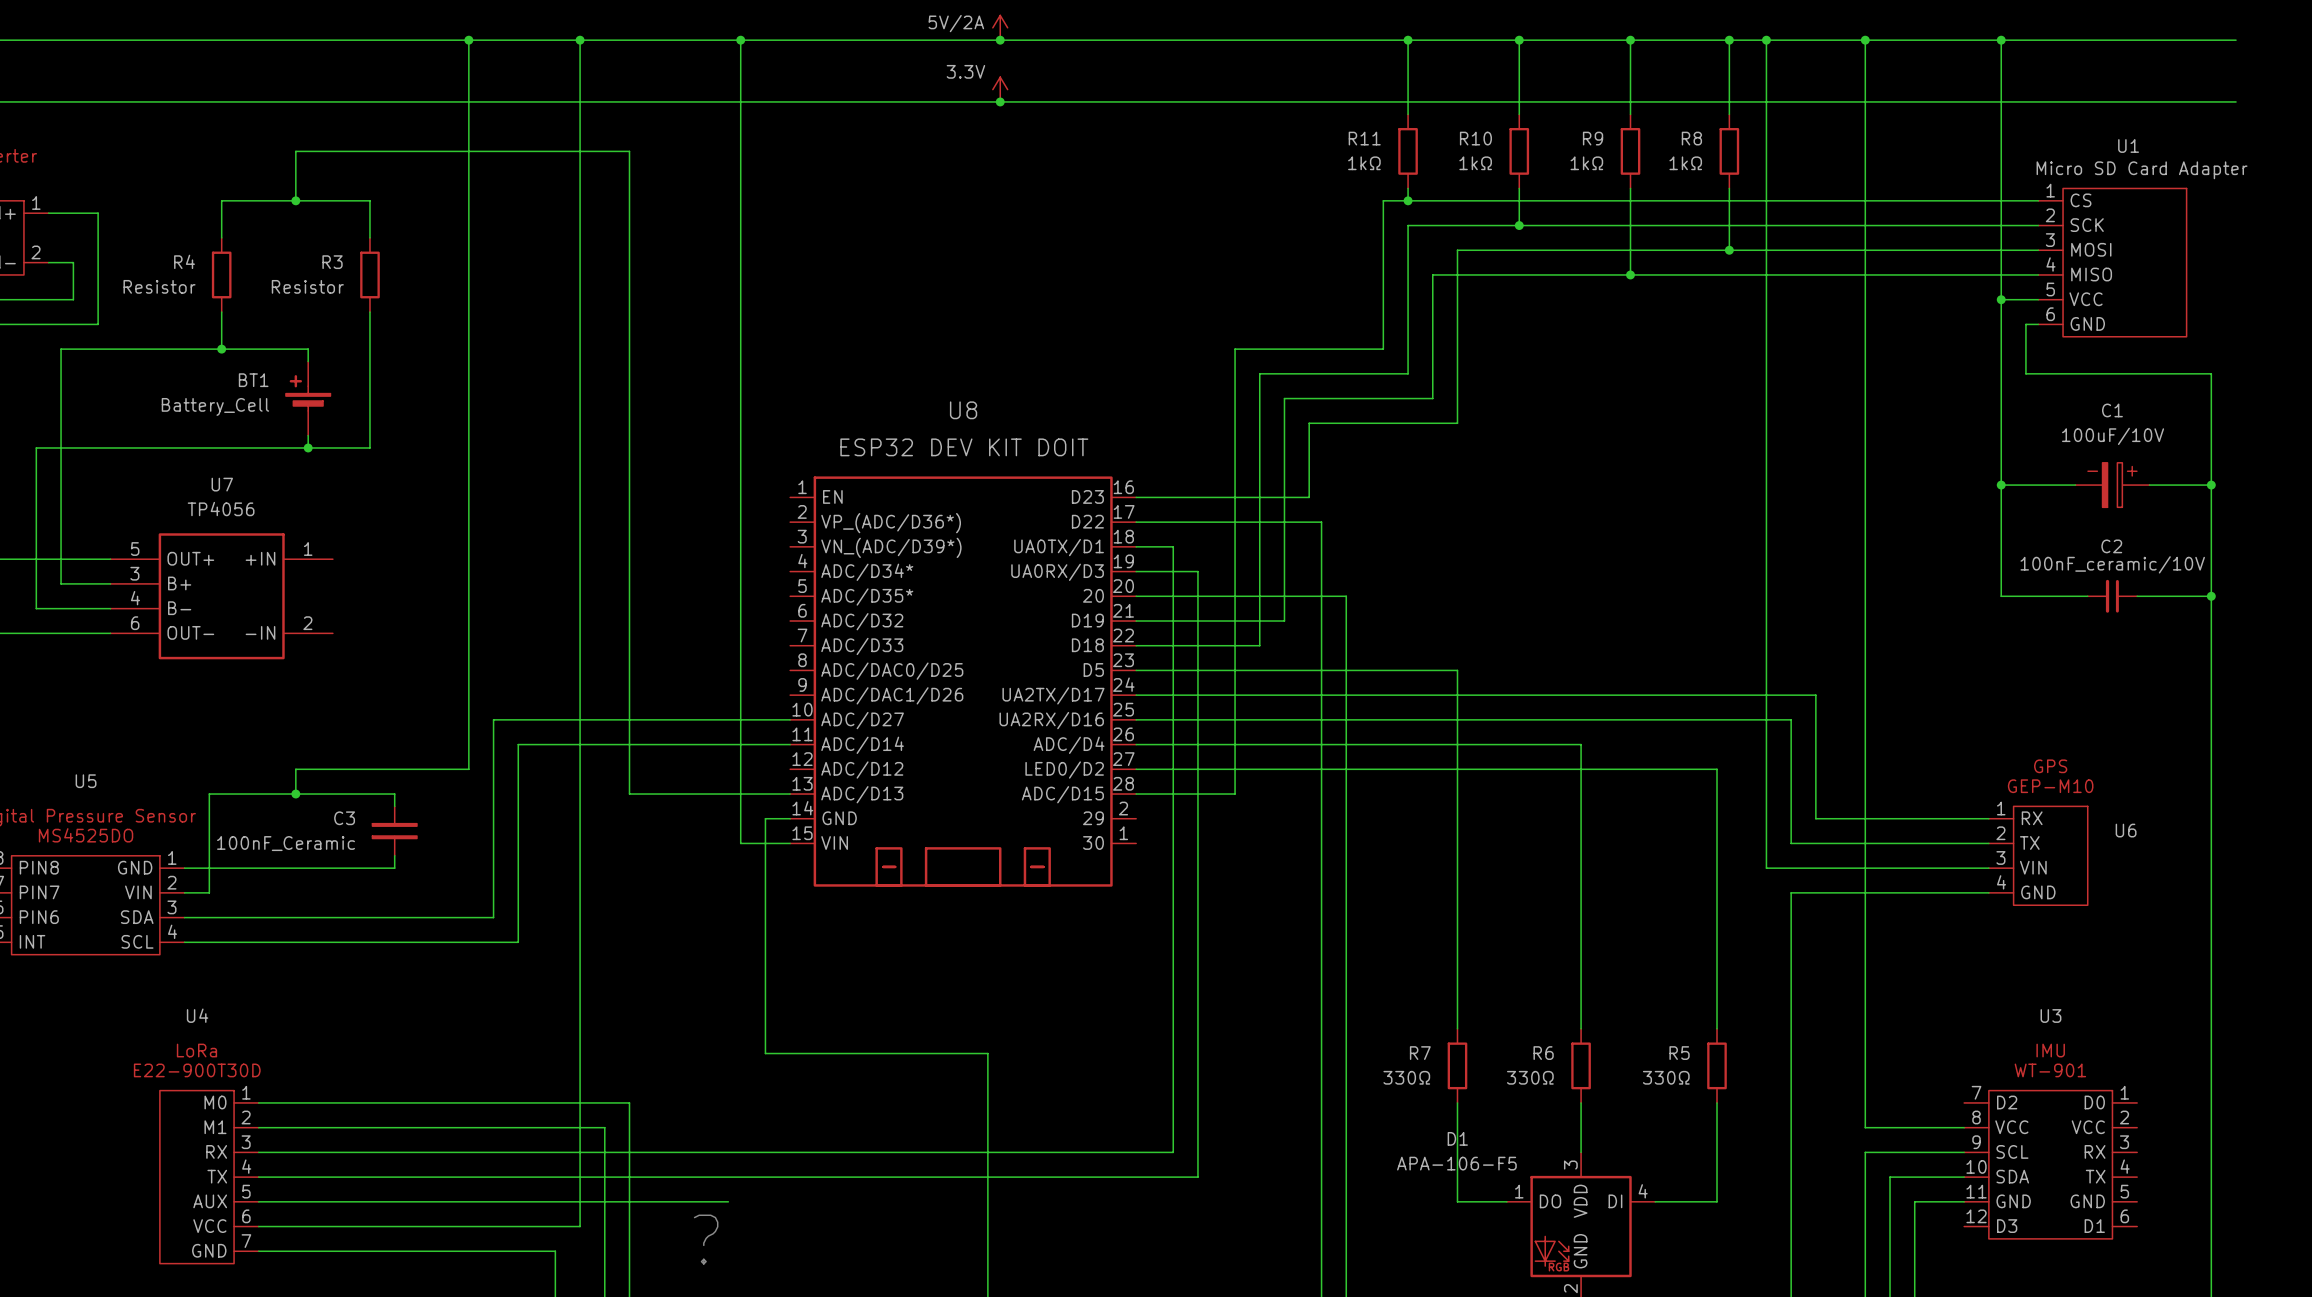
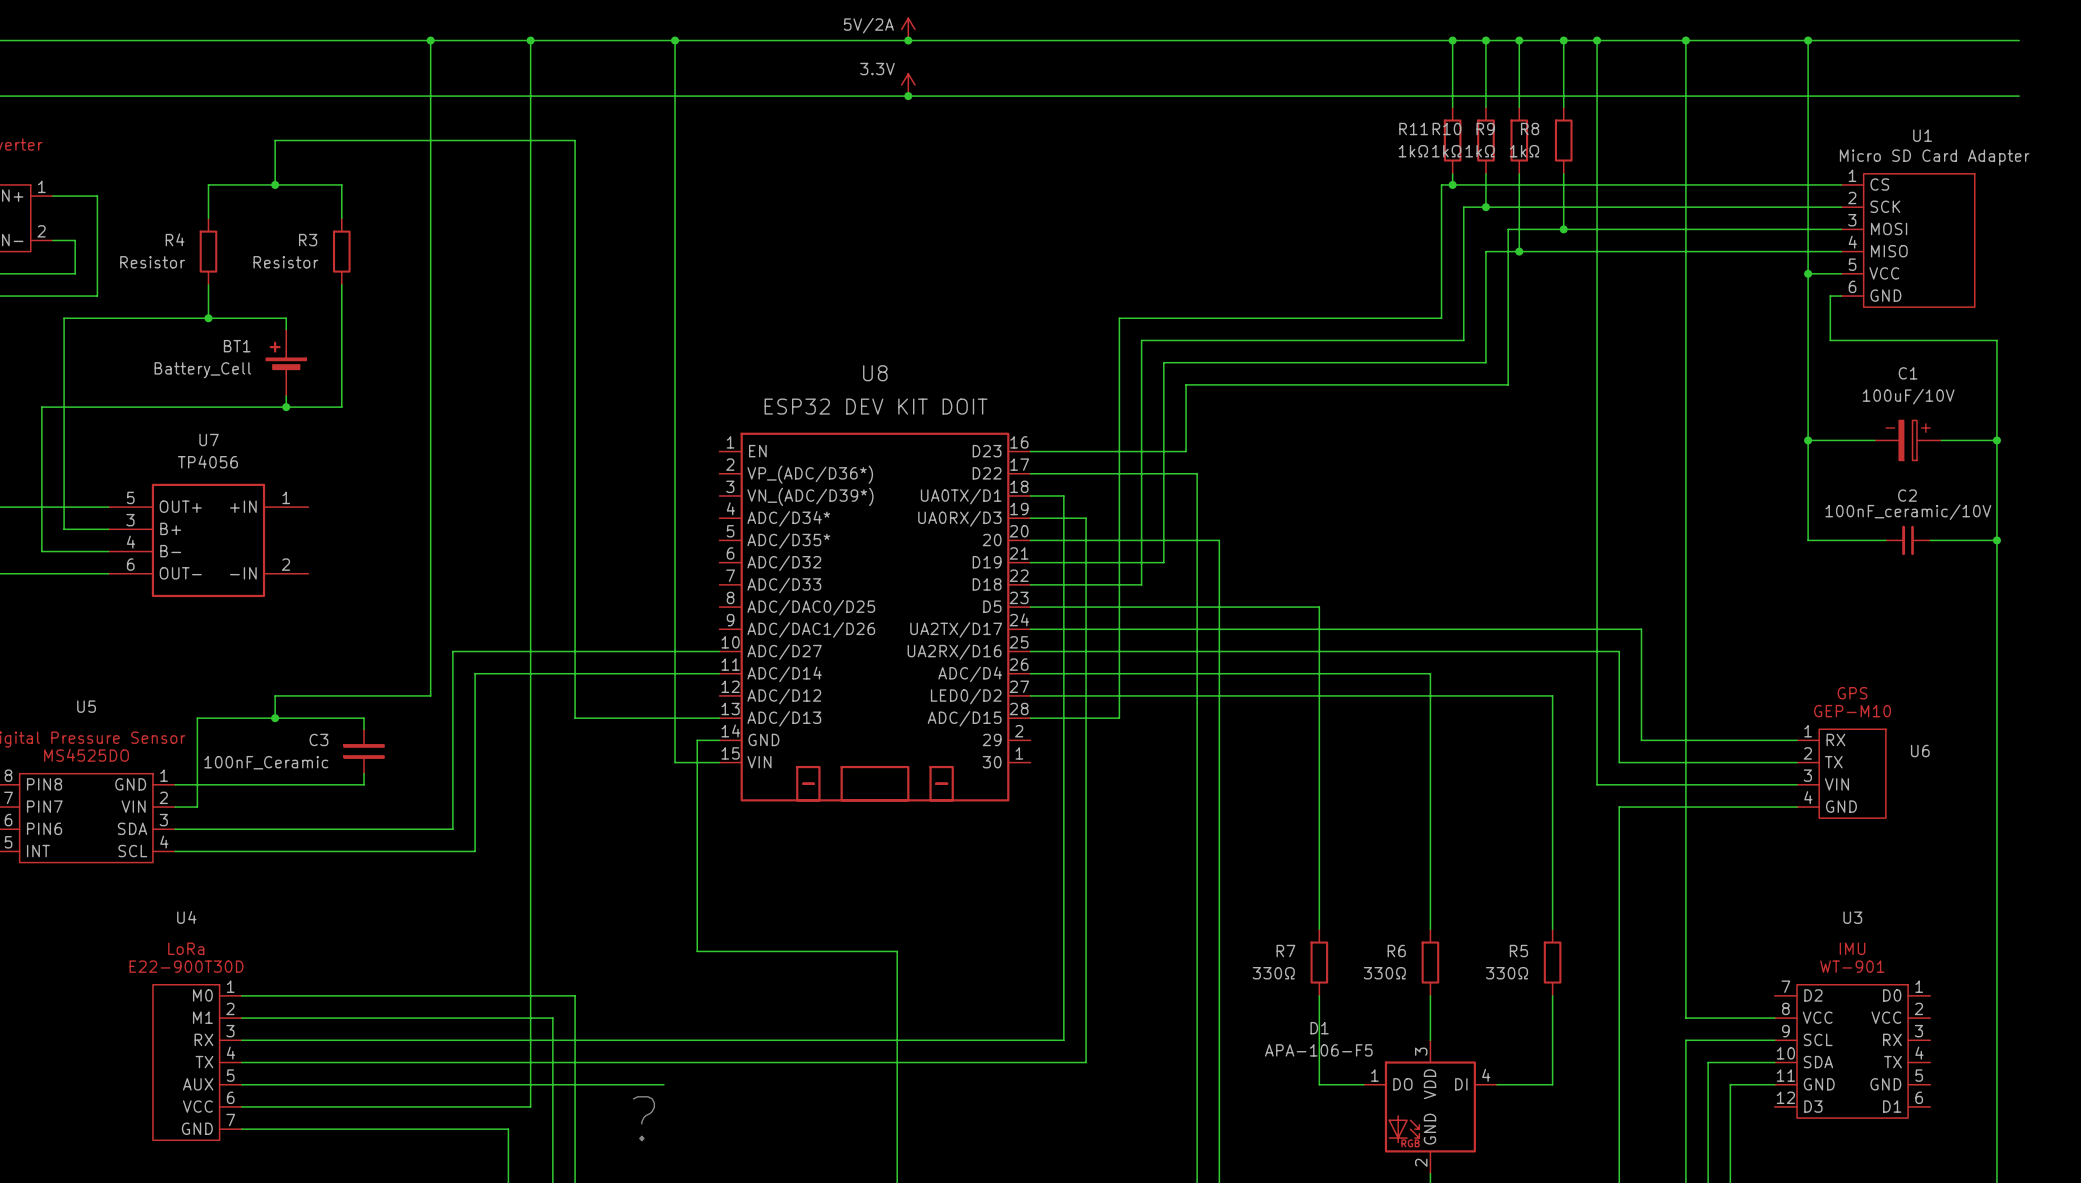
wire: (1408, 40) (1408, 114) -> (1452, 40) (1452, 107)
junction: (1408, 40) -> none
wire: (1519, 40) (1519, 114) -> (1485, 40) (1485, 107)
junction: (1519, 40) -> none
junction: none -> (1452, 40)
wire: (1630, 40) (1630, 114) -> (1519, 40) (1519, 107)
junction: (1630, 40) -> none
junction: none -> (1485, 40)
junction: none -> (1519, 40)
R11 position: (1408, 151) -> (1452, 140)
R10 position: (1519, 151) -> (1485, 140)
R9 position: (1630, 151) -> (1519, 140)
wire: (1408, 188) (1408, 200) -> (1452, 173) (1452, 184)
wire: (1519, 188) (1519, 225) -> (1485, 173) (1485, 207)
wire: (1630, 188) (1630, 274) -> (1519, 173) (1519, 251)
junction: (1408, 200) -> none
wire: (1593, 200) (1383, 200) (1383, 349) -> (1441, 184) (1441, 318) (1252, 318)
junction: none -> (1452, 184)
junction: (1519, 225) -> none
wire: (1618, 225) (1408, 225) (1408, 373) -> (1463, 207) (1463, 340) (1274, 340)
junction: none -> (1485, 207)
wire: (1667, 250) (1457, 250) (1457, 423) -> (1508, 229) (1508, 384) (1319, 384)
junction: (1630, 274) -> none
wire: (1642, 274) (1432, 274) (1432, 398) -> (1485, 251) (1485, 362) (1297, 362)
junction: none -> (1519, 251)

